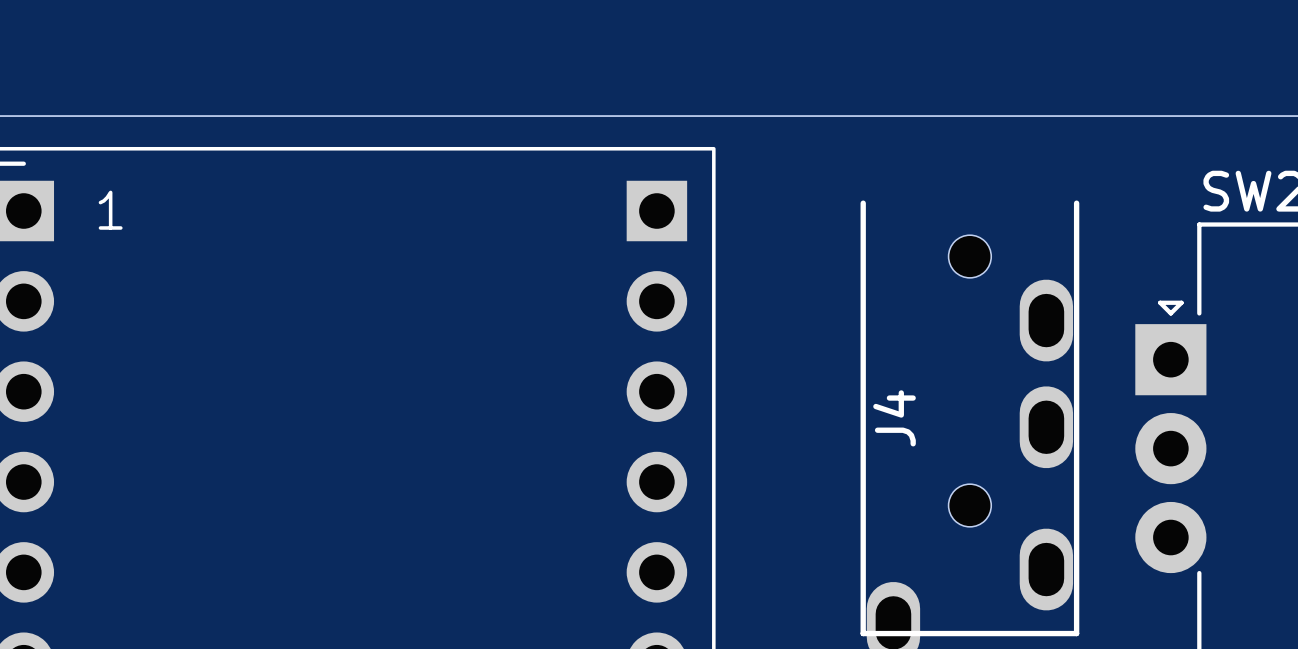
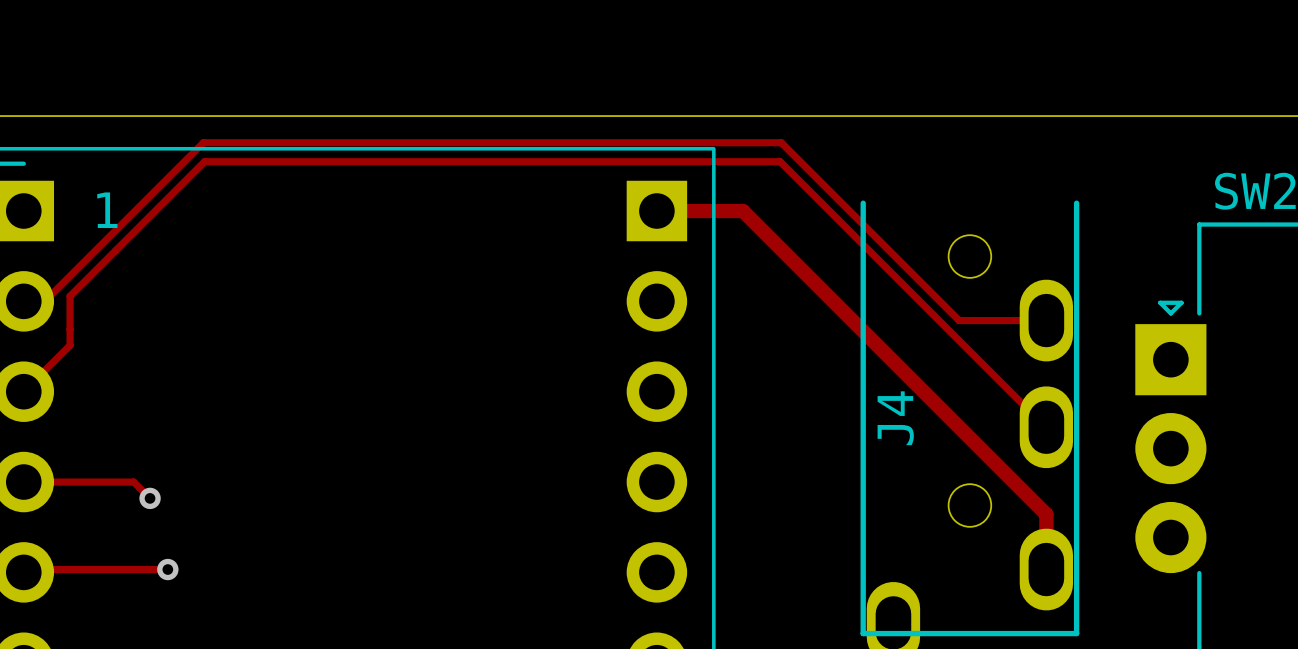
track: none -> (656, 211) (742, 211) (1046, 514) (1046, 569)
track: none -> (23, 301) (44, 301) (203, 142) (781, 142) (959, 320) (1046, 320)
track: none -> (23, 391) (70, 345) (70, 296) (204, 161) (780, 161) (1045, 427)
track: none -> (23, 482) (133, 482) (150, 498)
via: none -> (150, 498)
track: none -> (167, 569) (26, 569) (23, 572)
via: none -> (167, 569)

